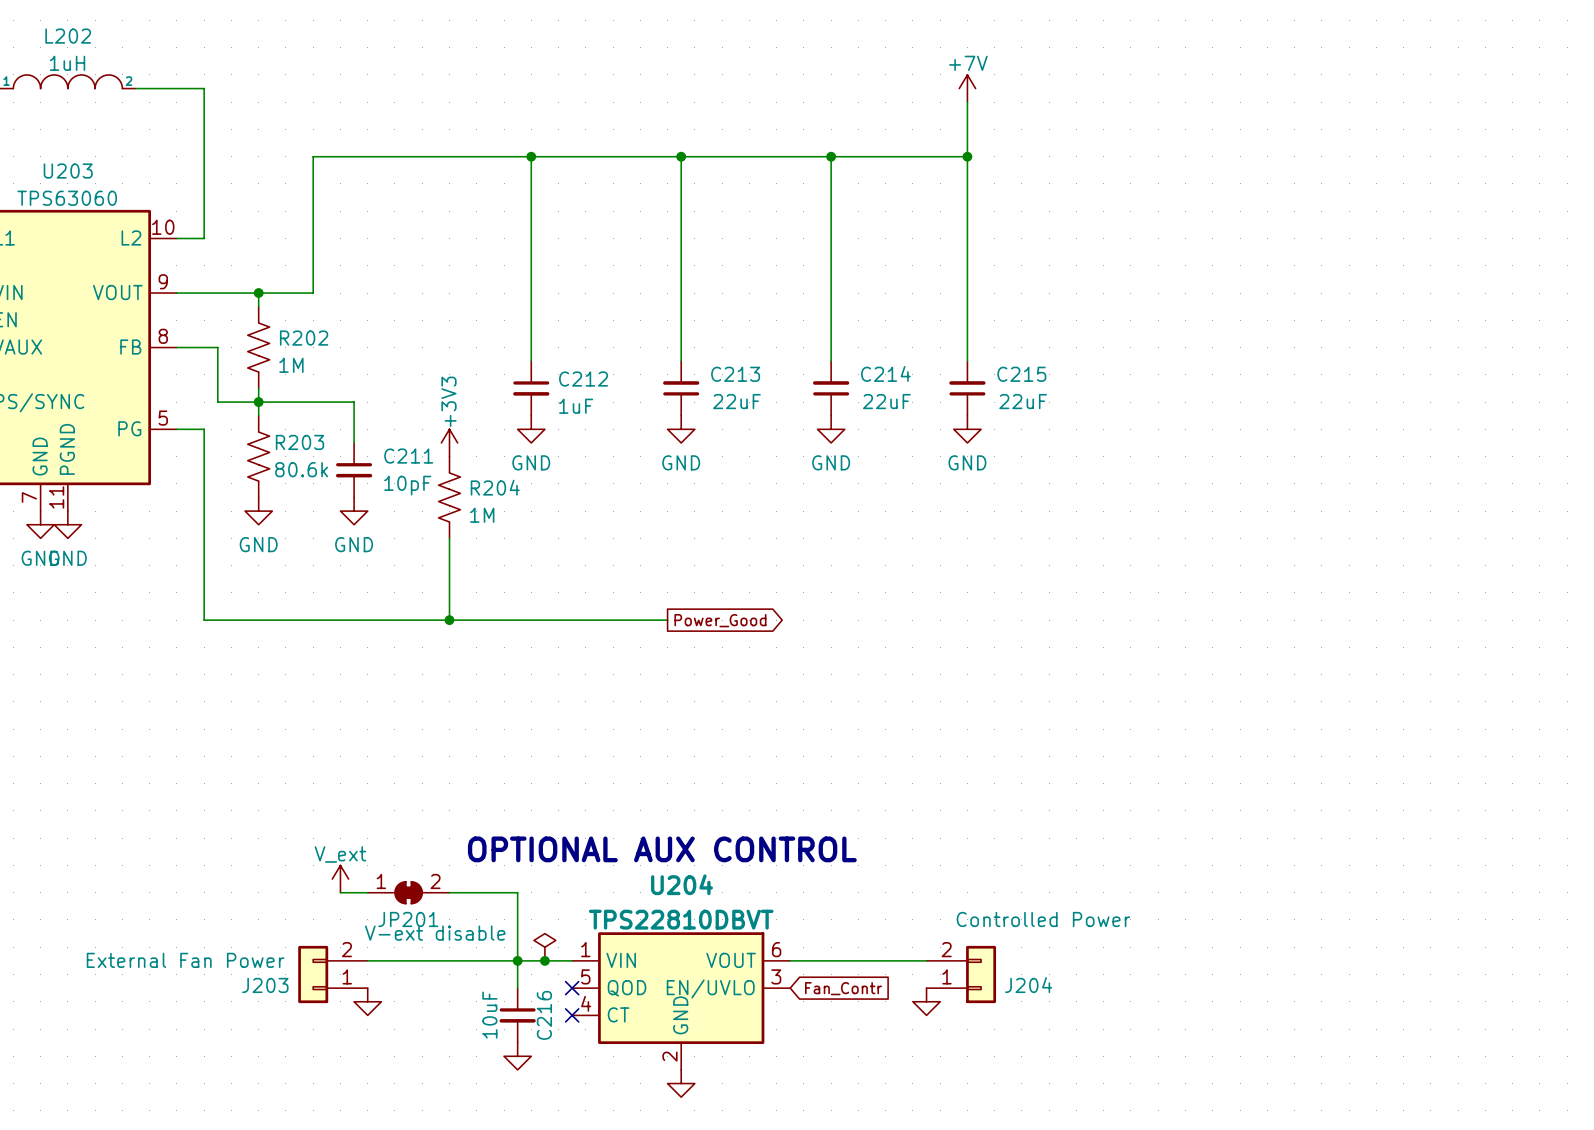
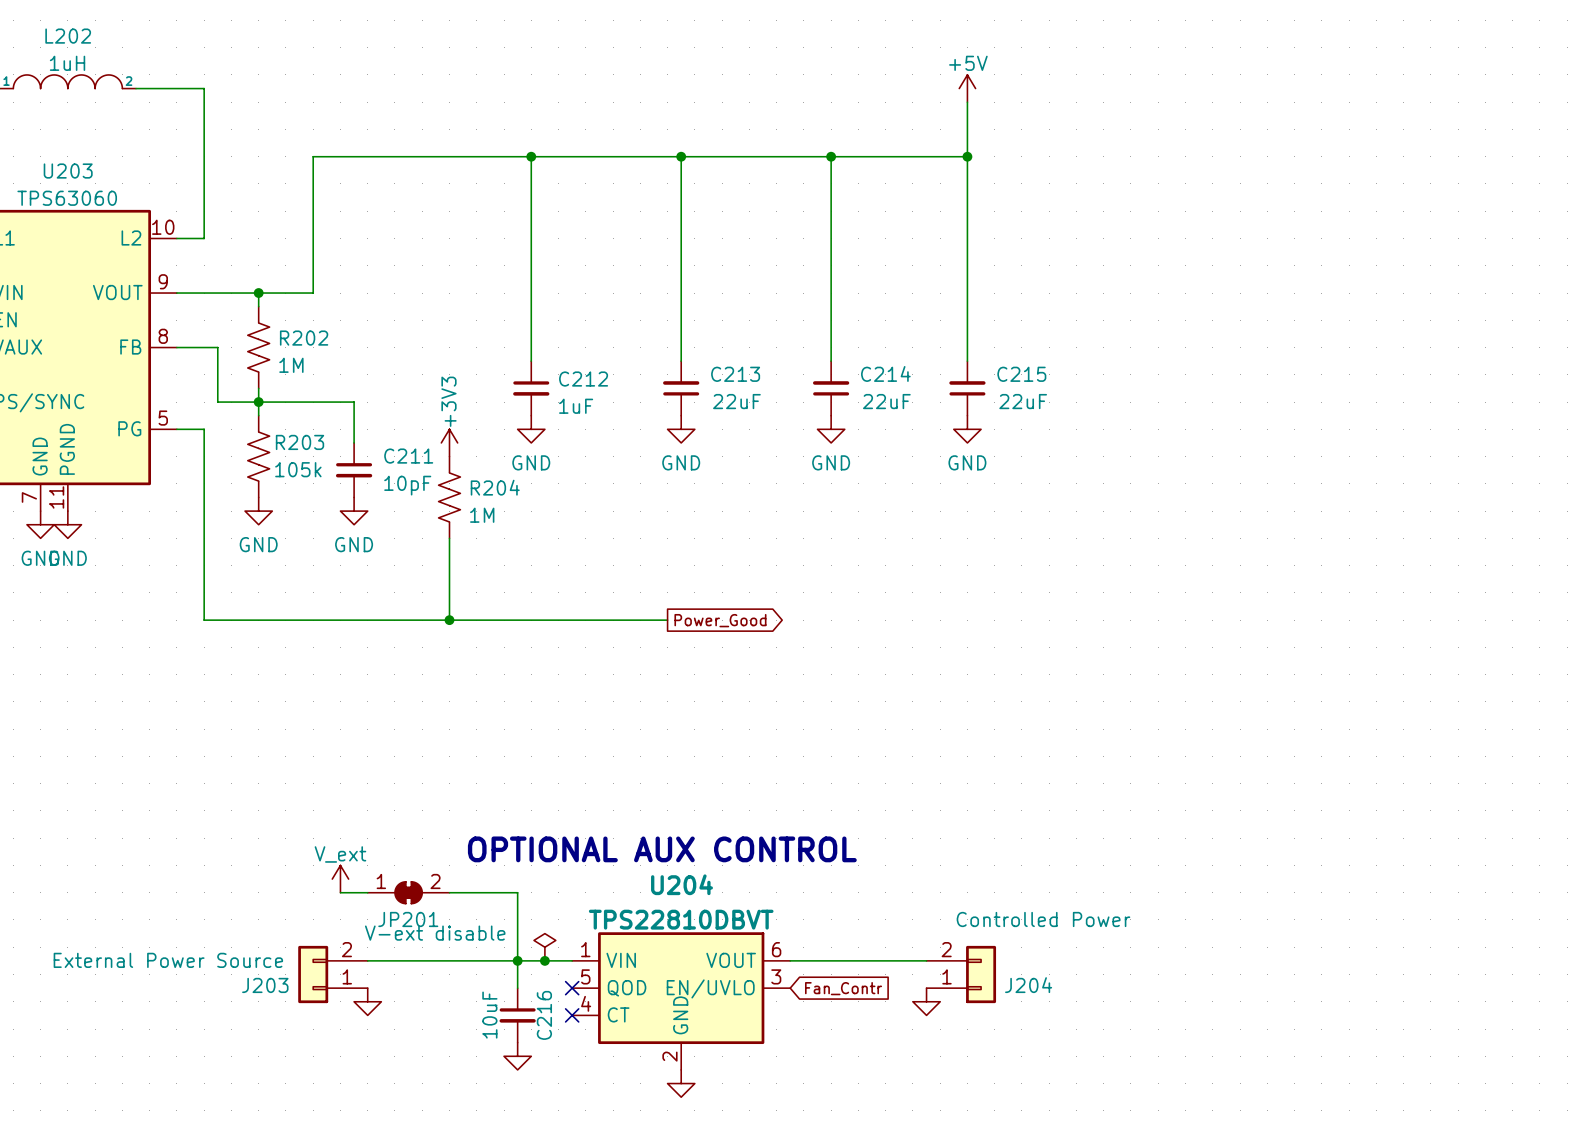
power symbol: +7V (967, 88) -> +5V (967, 88)
R203 value: 80.6k (301, 469) -> 105k (298, 469)
J203 value: External Fan Power (185, 960) -> External Power Source (168, 960)

